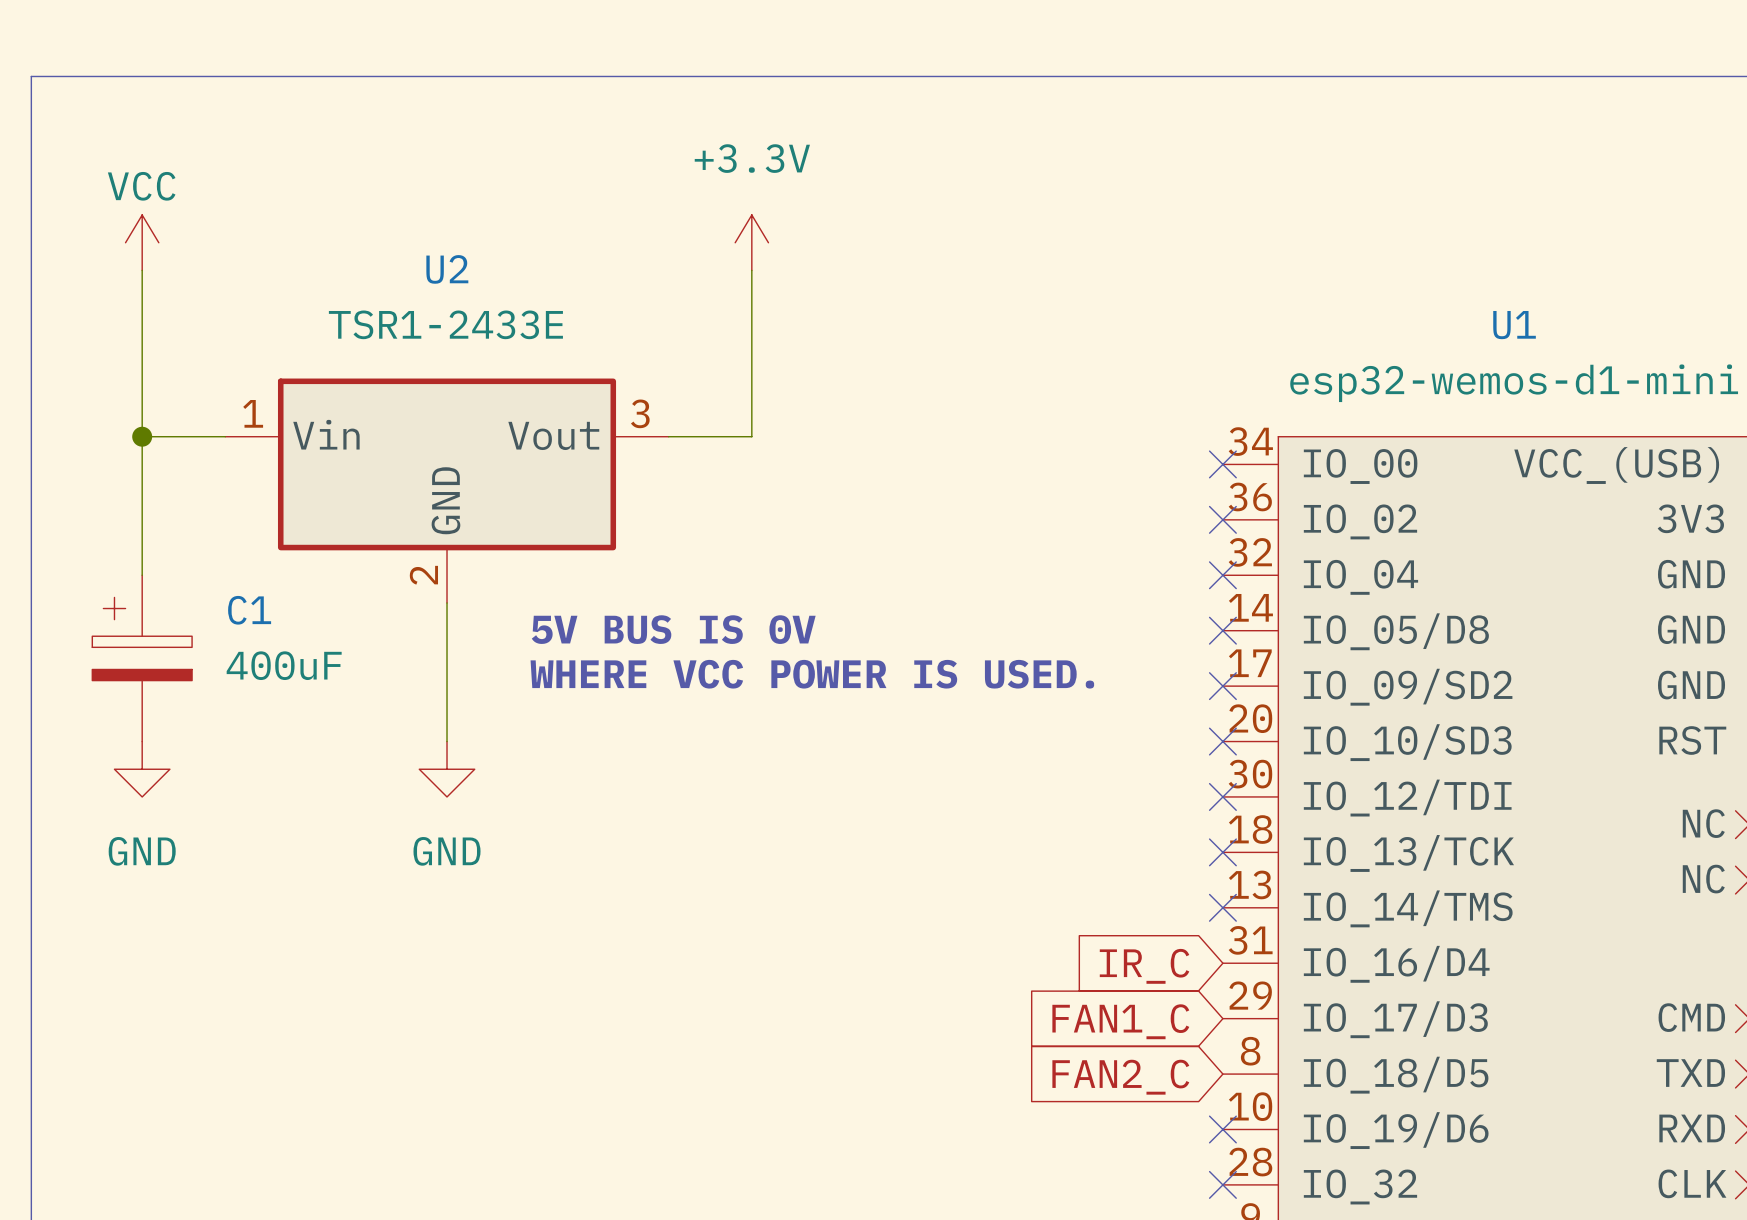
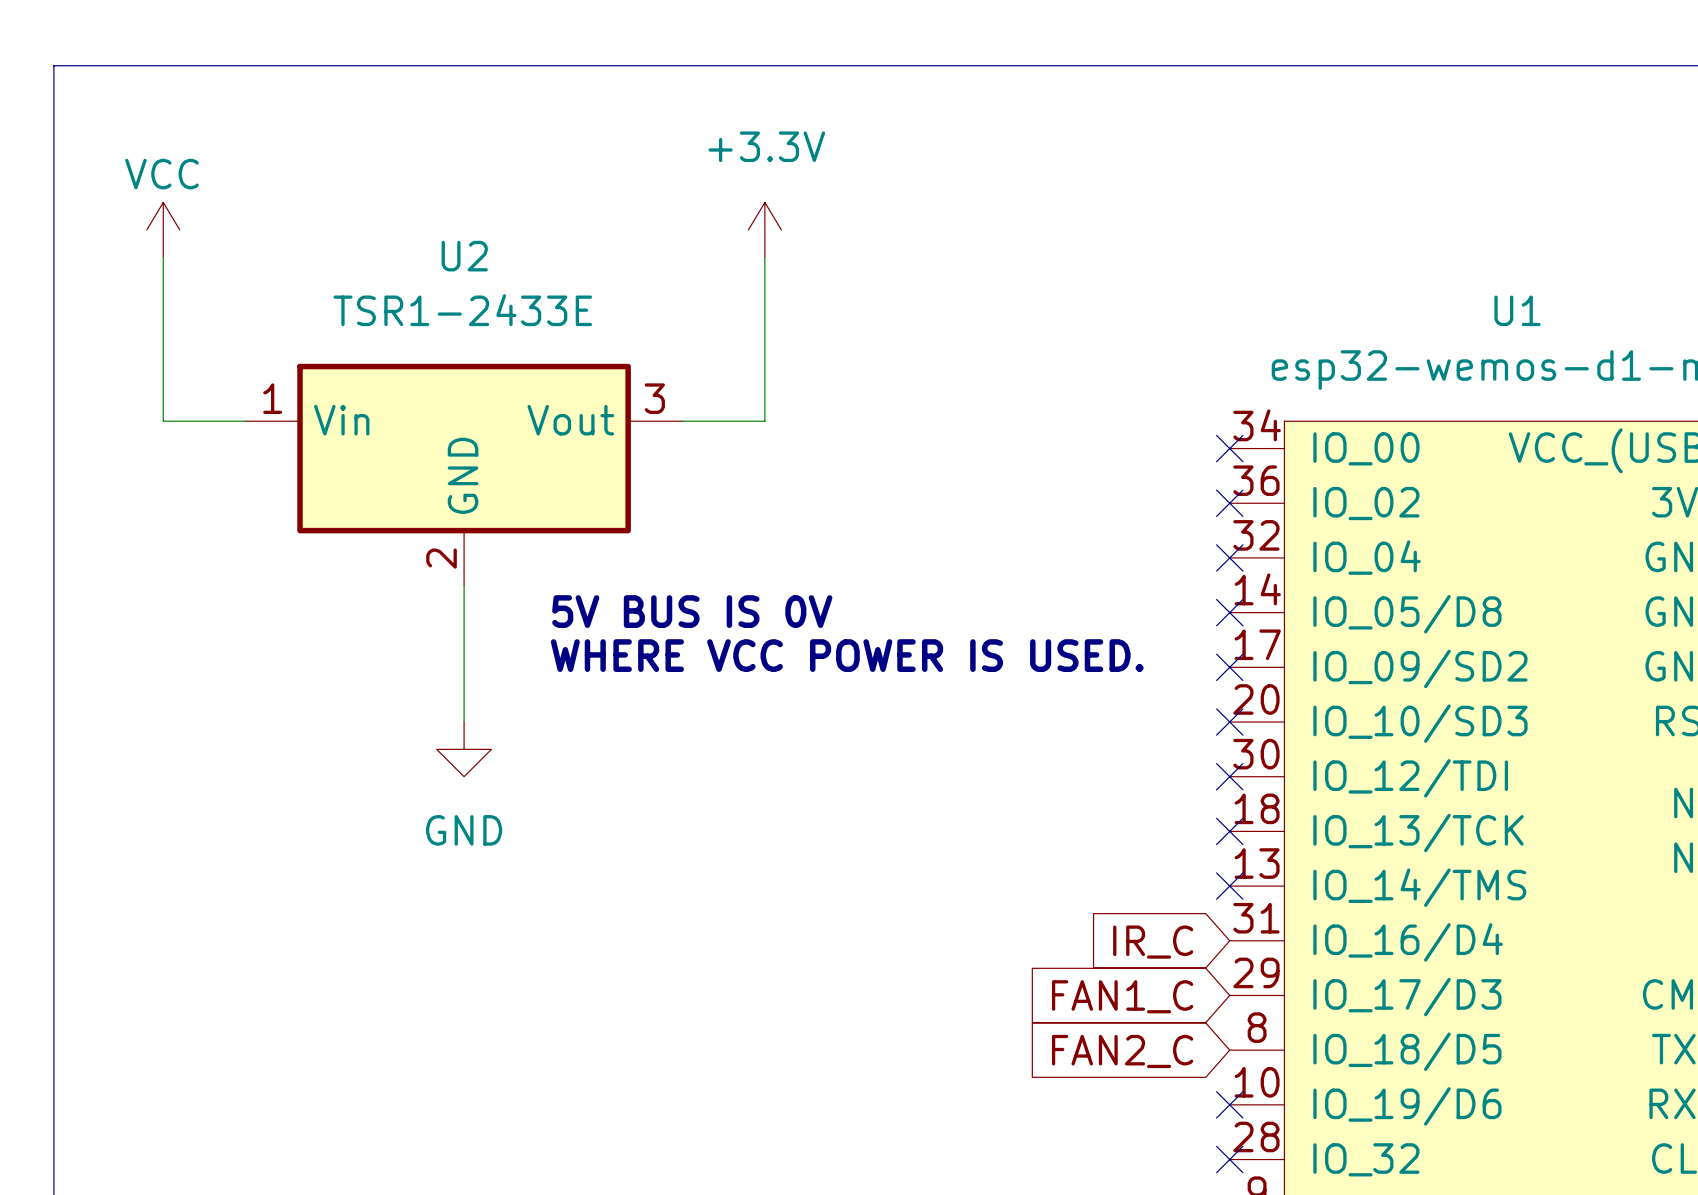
wire: (142, 436) (142, 575) -> none
junction: (142, 436) -> none
C1: 400uF (142, 658) -> none
power symbol: GND (142, 769) -> none

